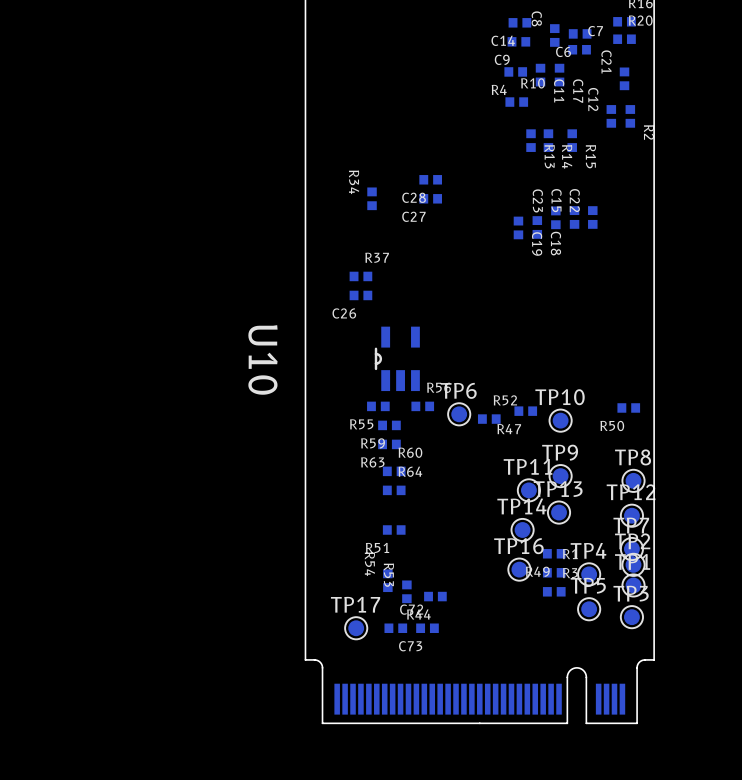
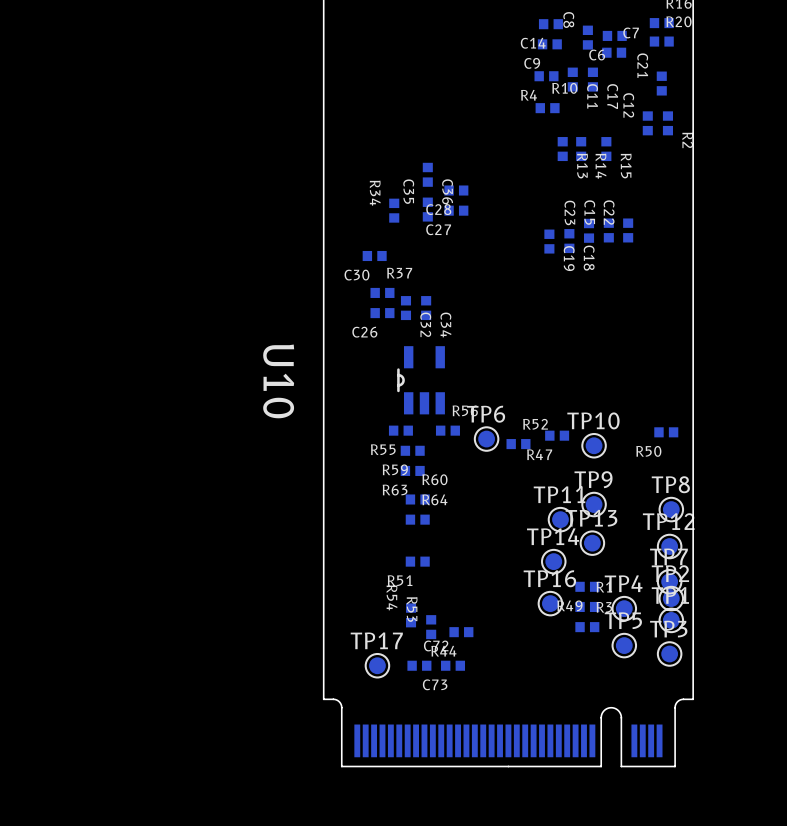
C36: none -> (427, 174)
C35: none -> (427, 209)
C30: none -> (374, 256)
C32: none -> (405, 308)
C34: none -> (426, 308)

